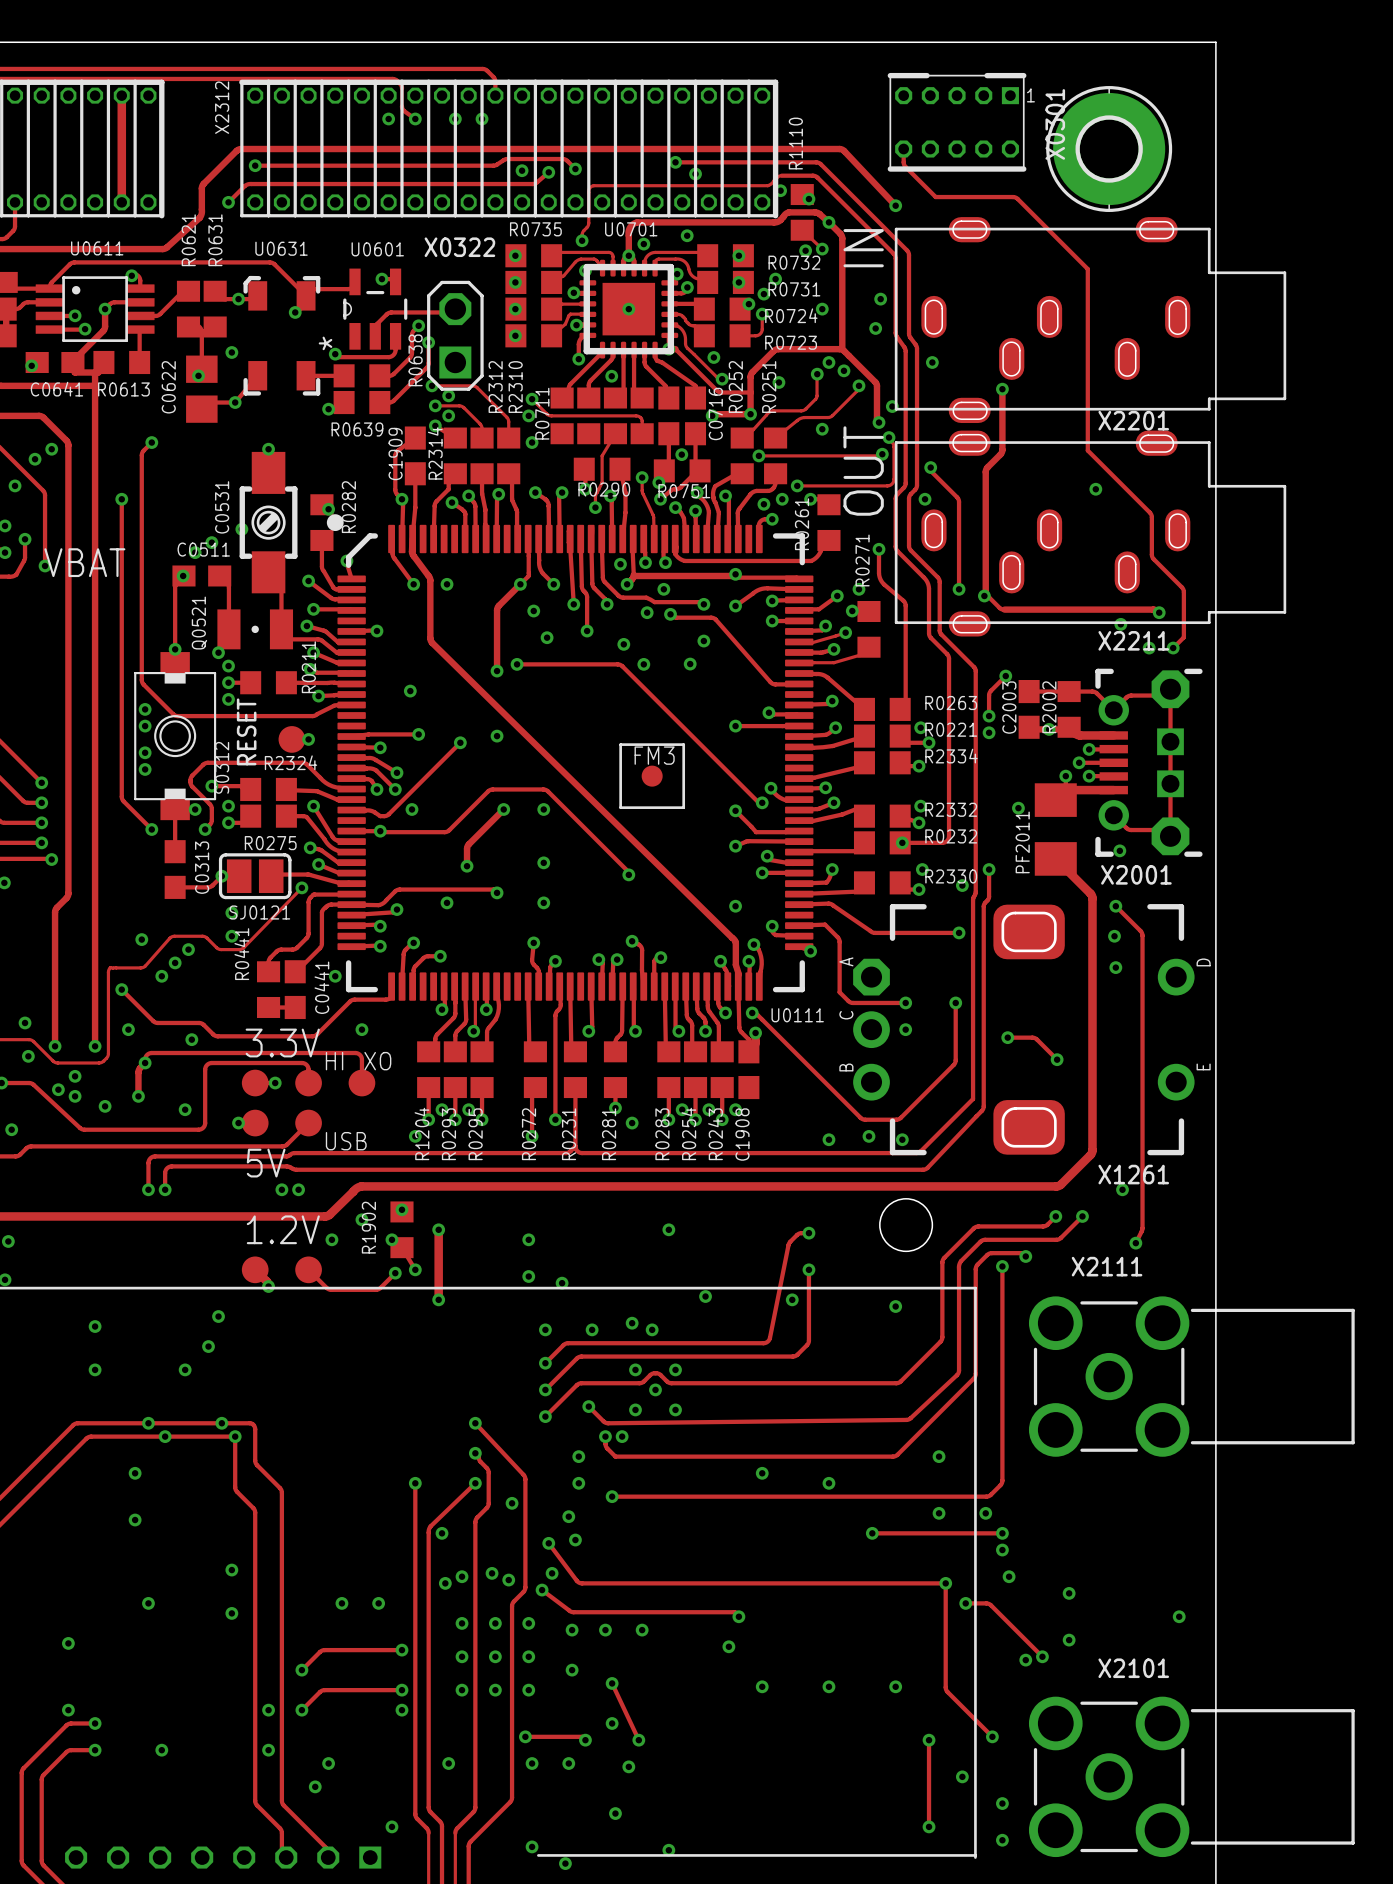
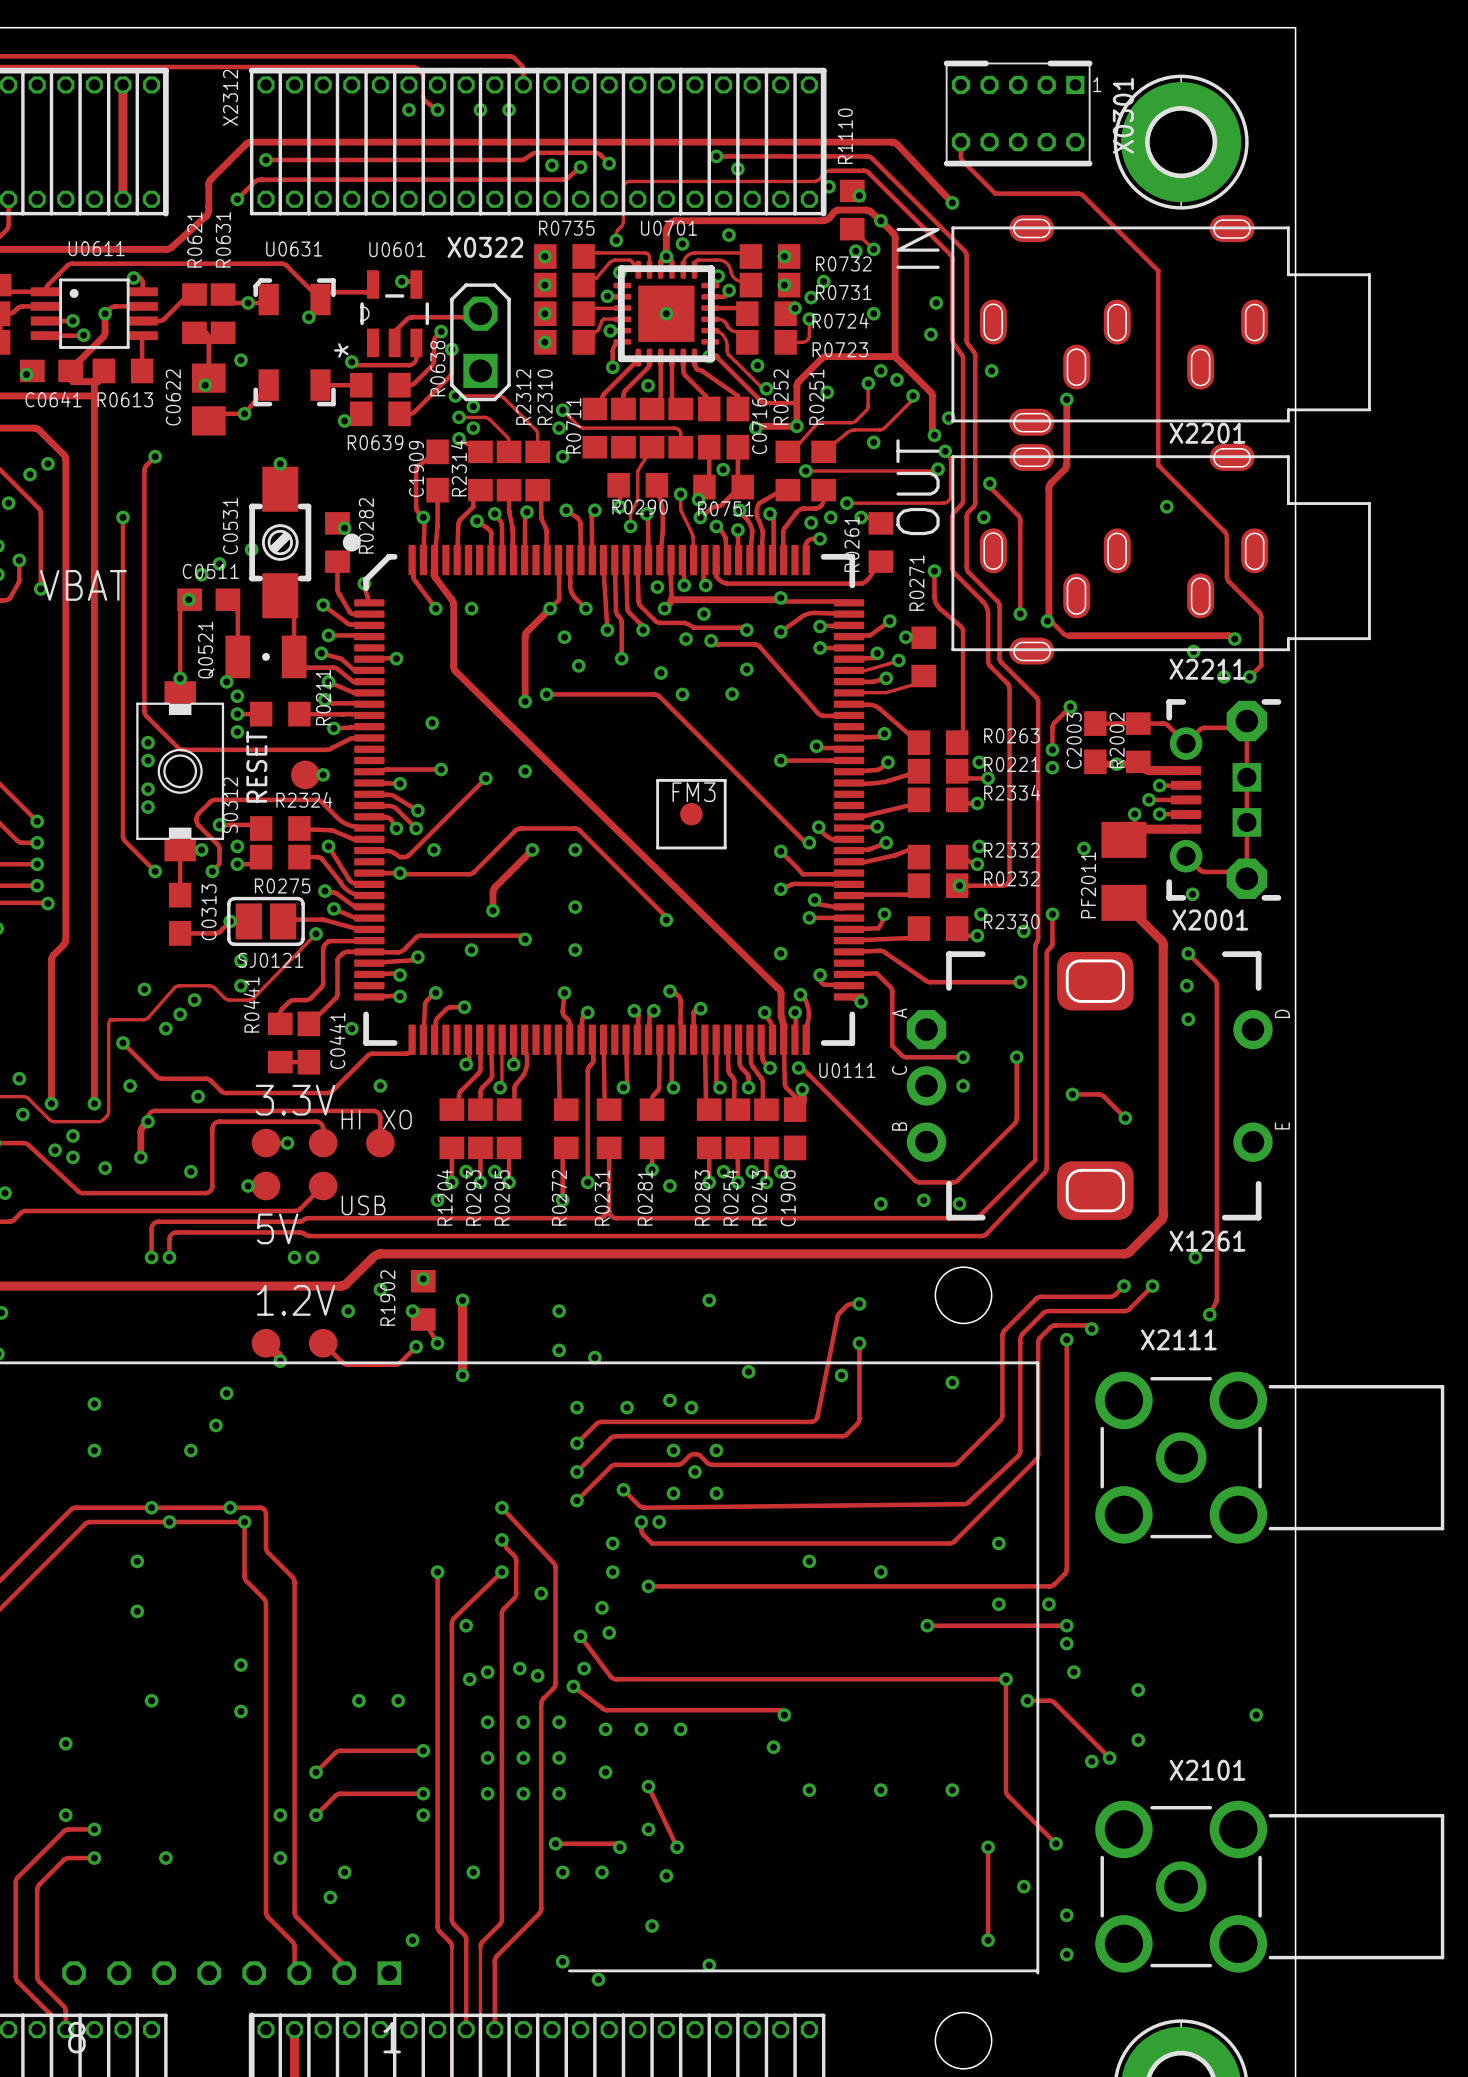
via: (858, 589) -> none

